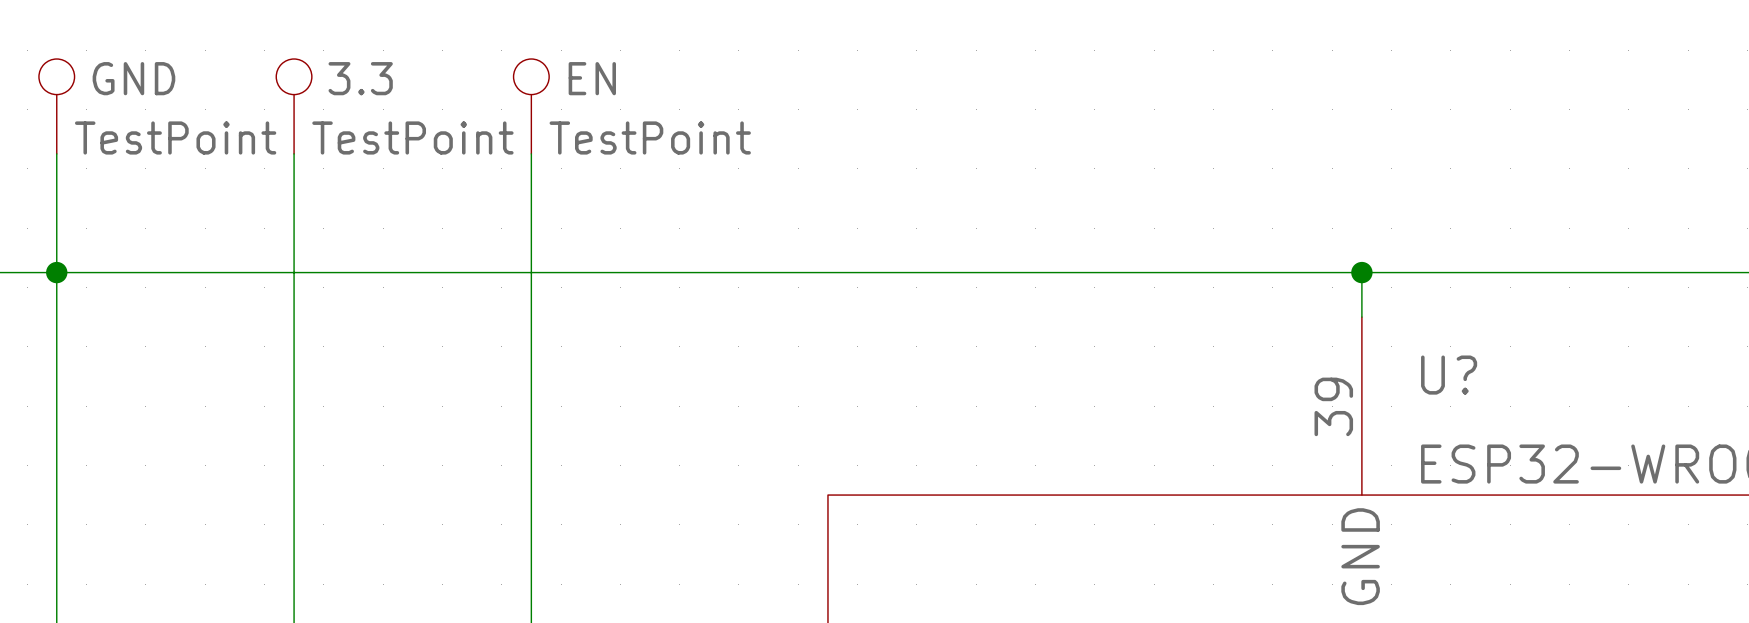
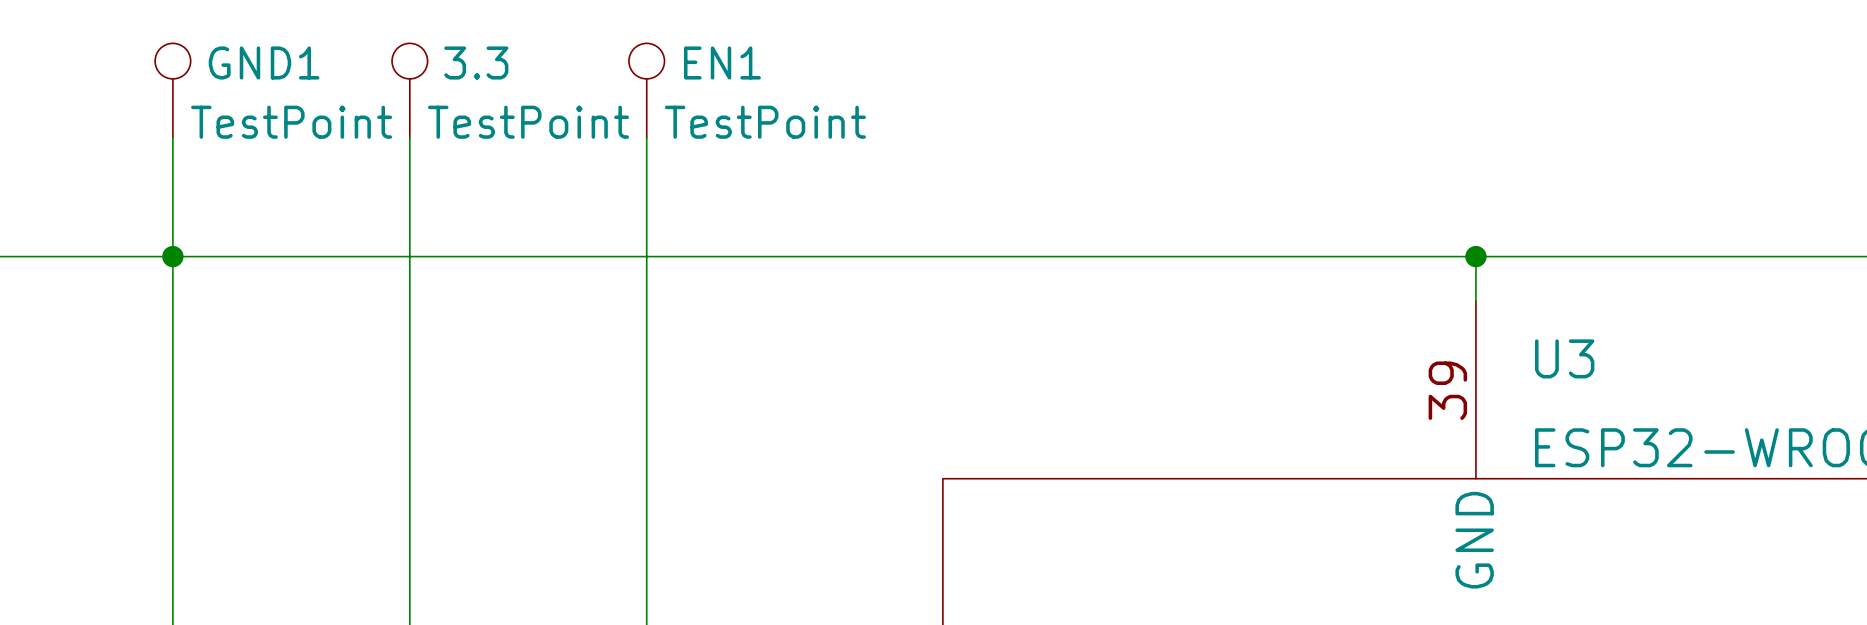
GND name: GND (133, 78) -> GND1 (264, 62)
EN name: EN (592, 78) -> EN1 (722, 62)
U? name: U? (1449, 375) -> U3 (1564, 358)

